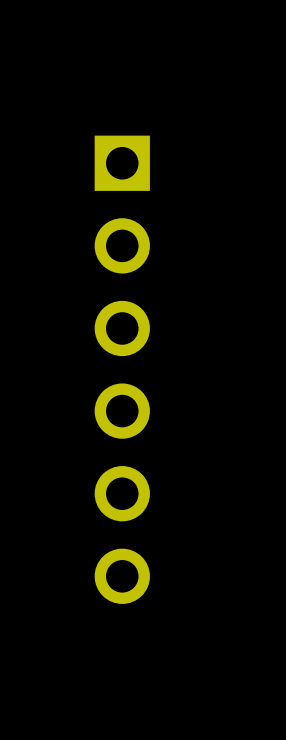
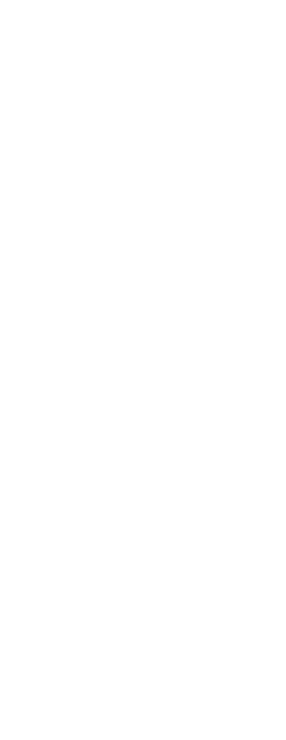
part: (122, 369) -> none

